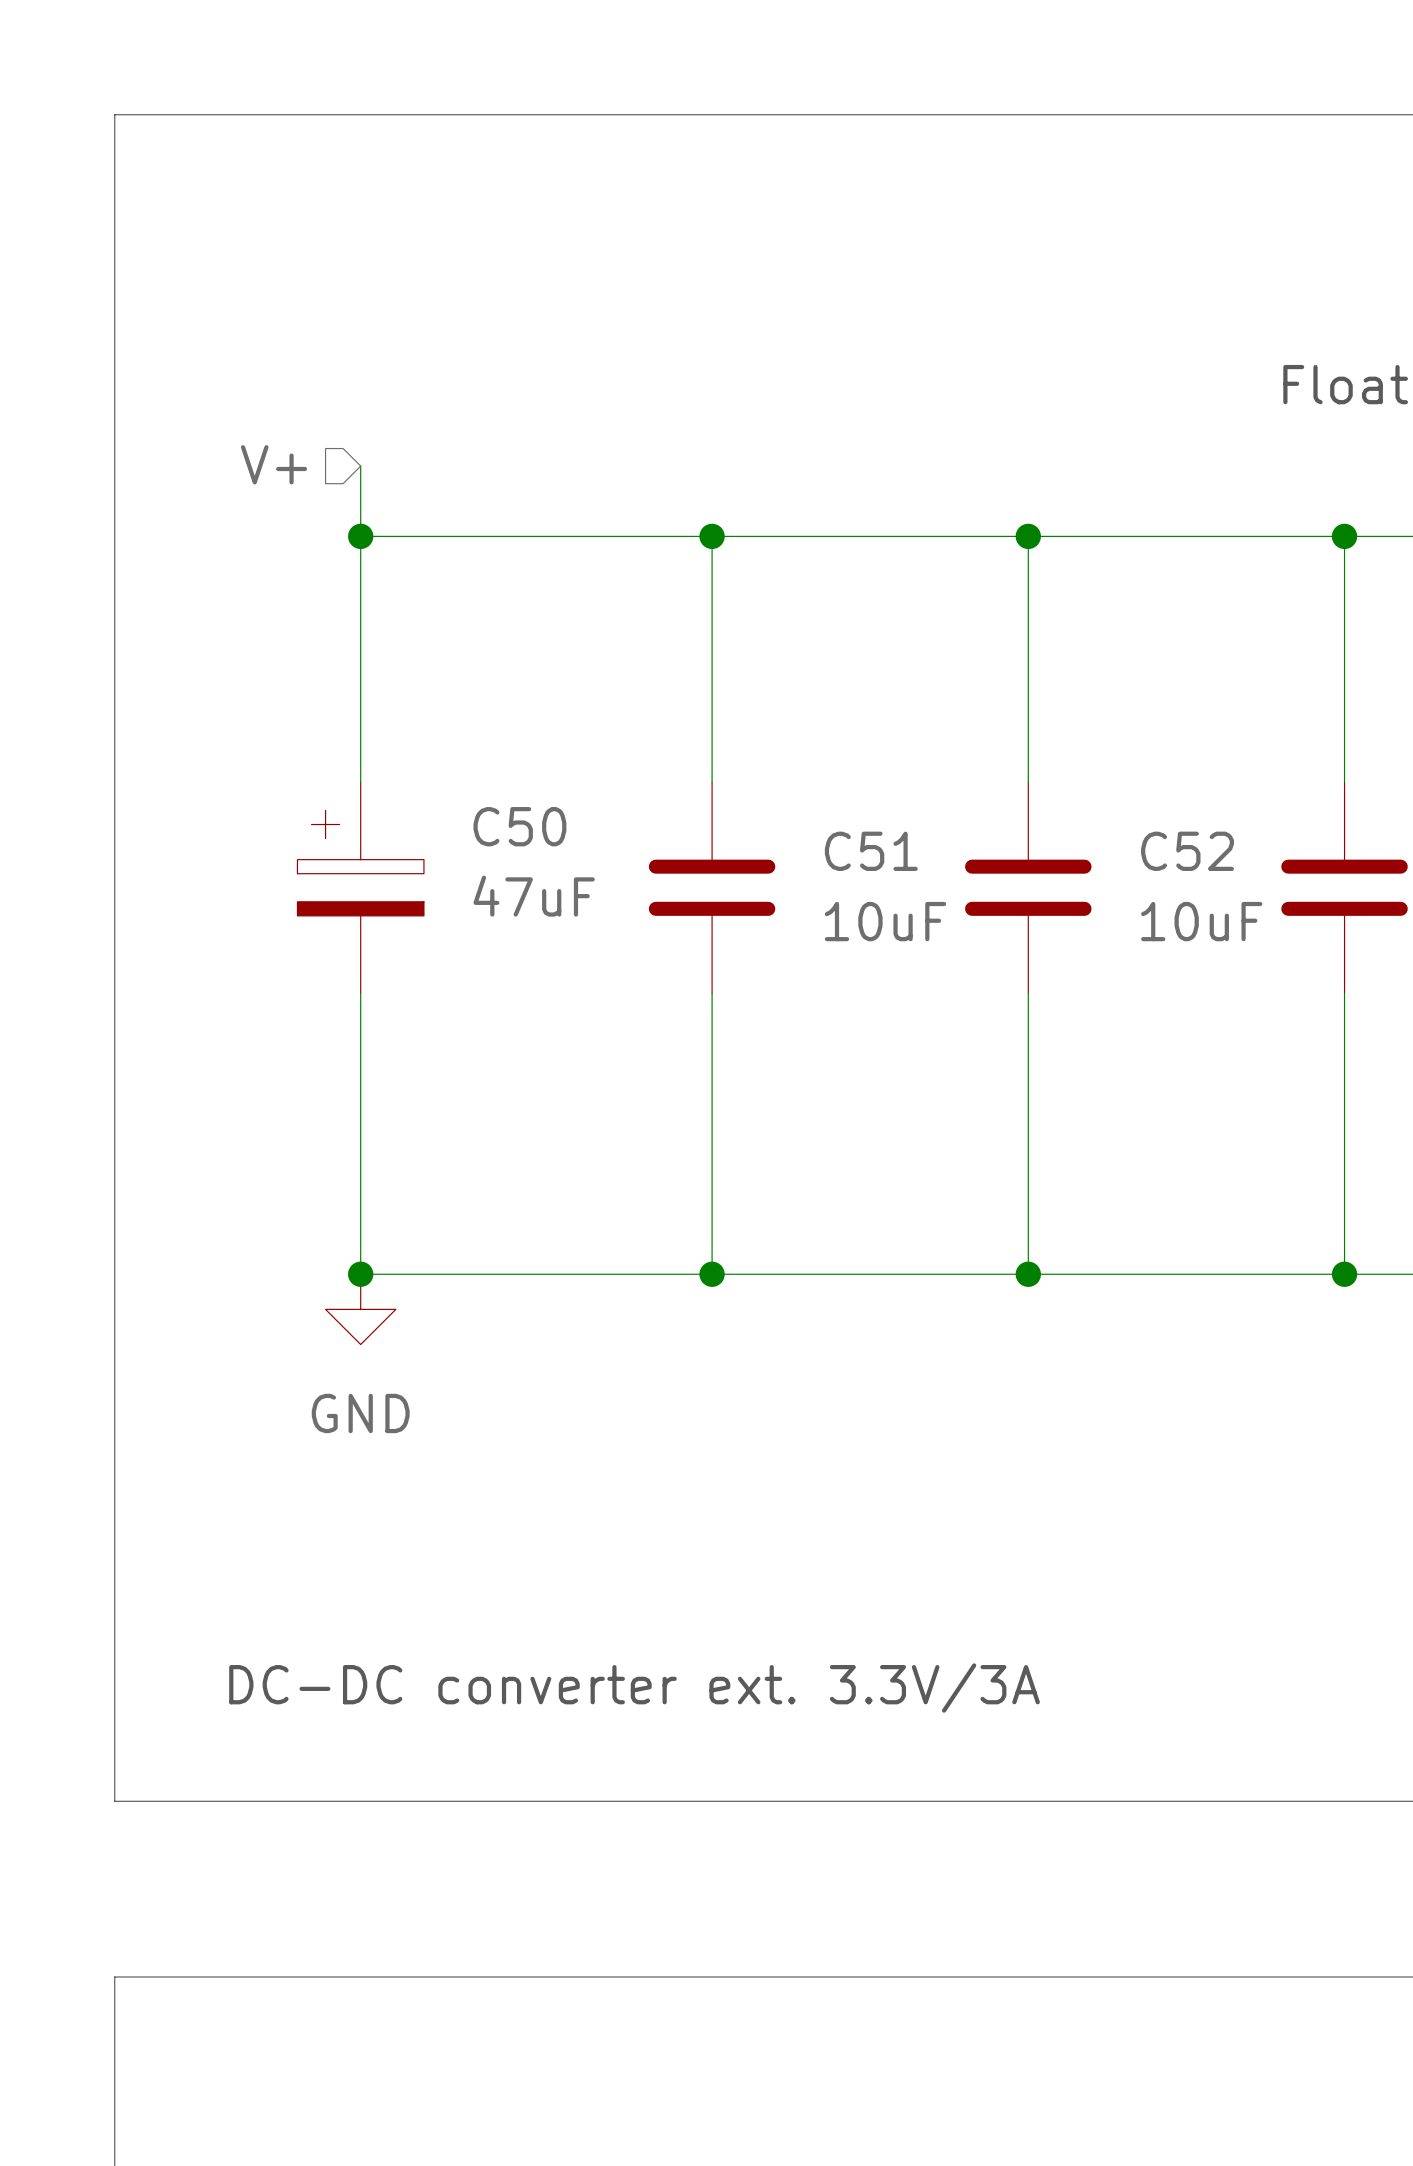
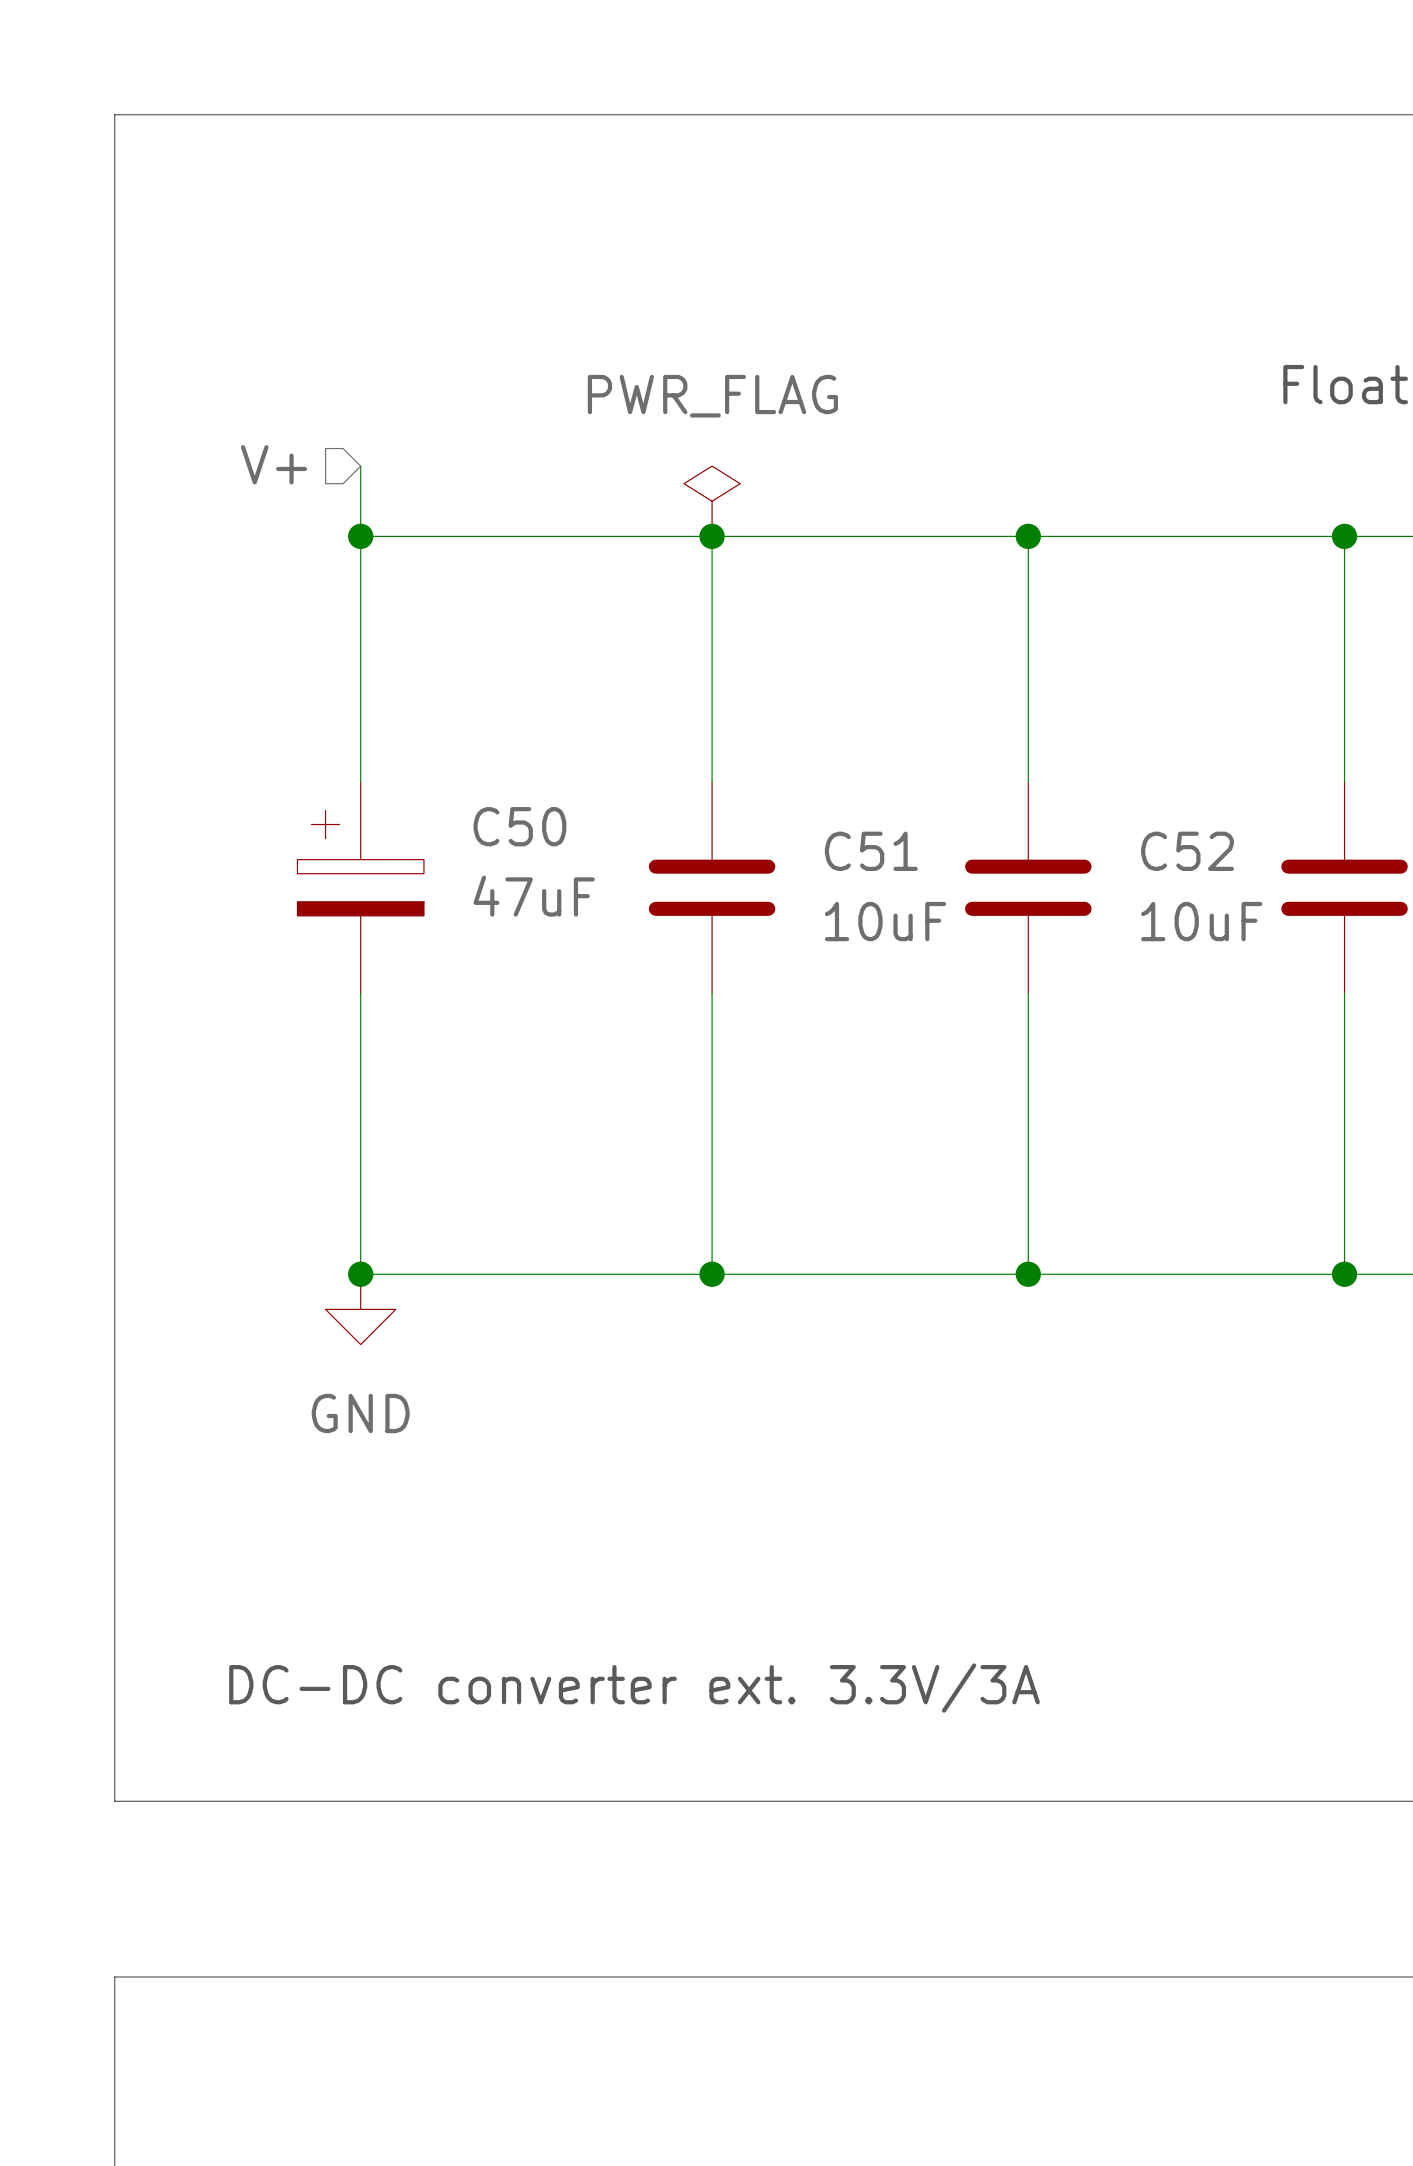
power symbol: none -> PWR_FLAG (712, 501)

